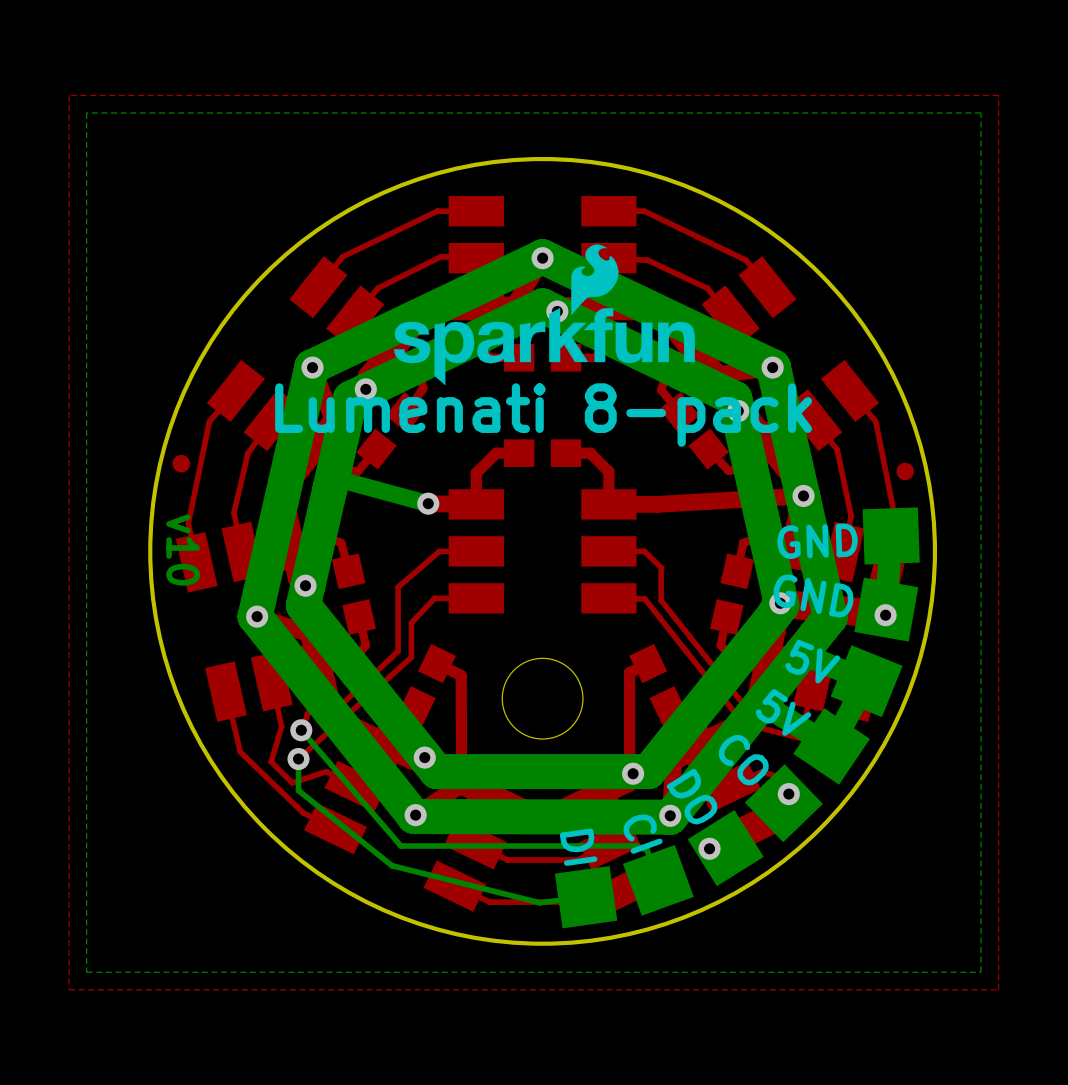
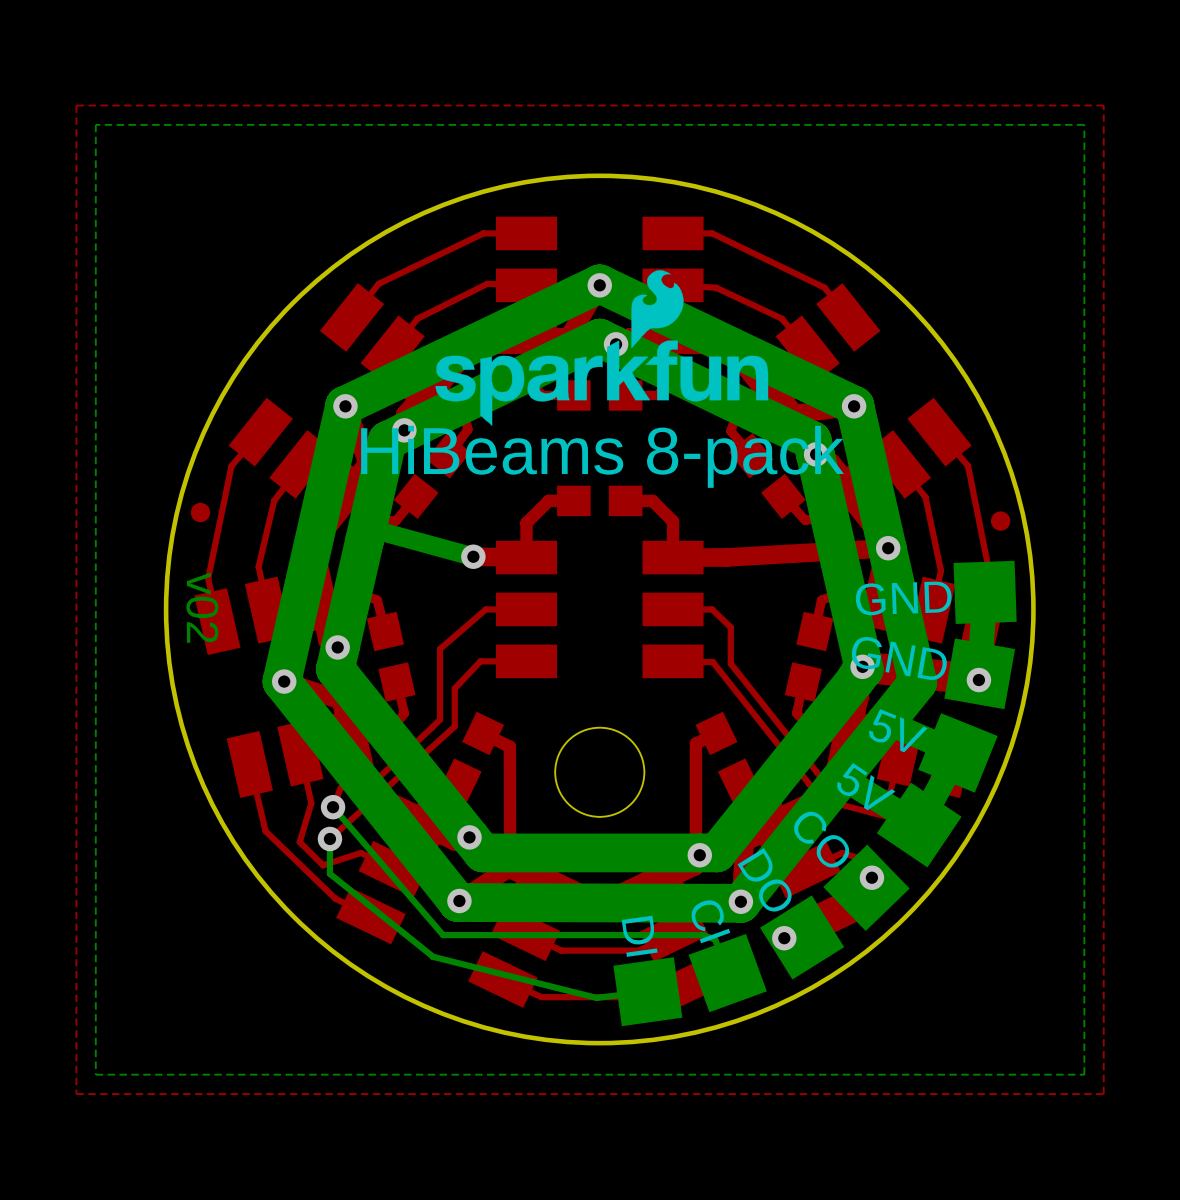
text: Lumenati 8-pack (543, 415) -> HiBeams 8-pack (602, 456)
text: v10 (183, 550) -> v02 (202, 607)

